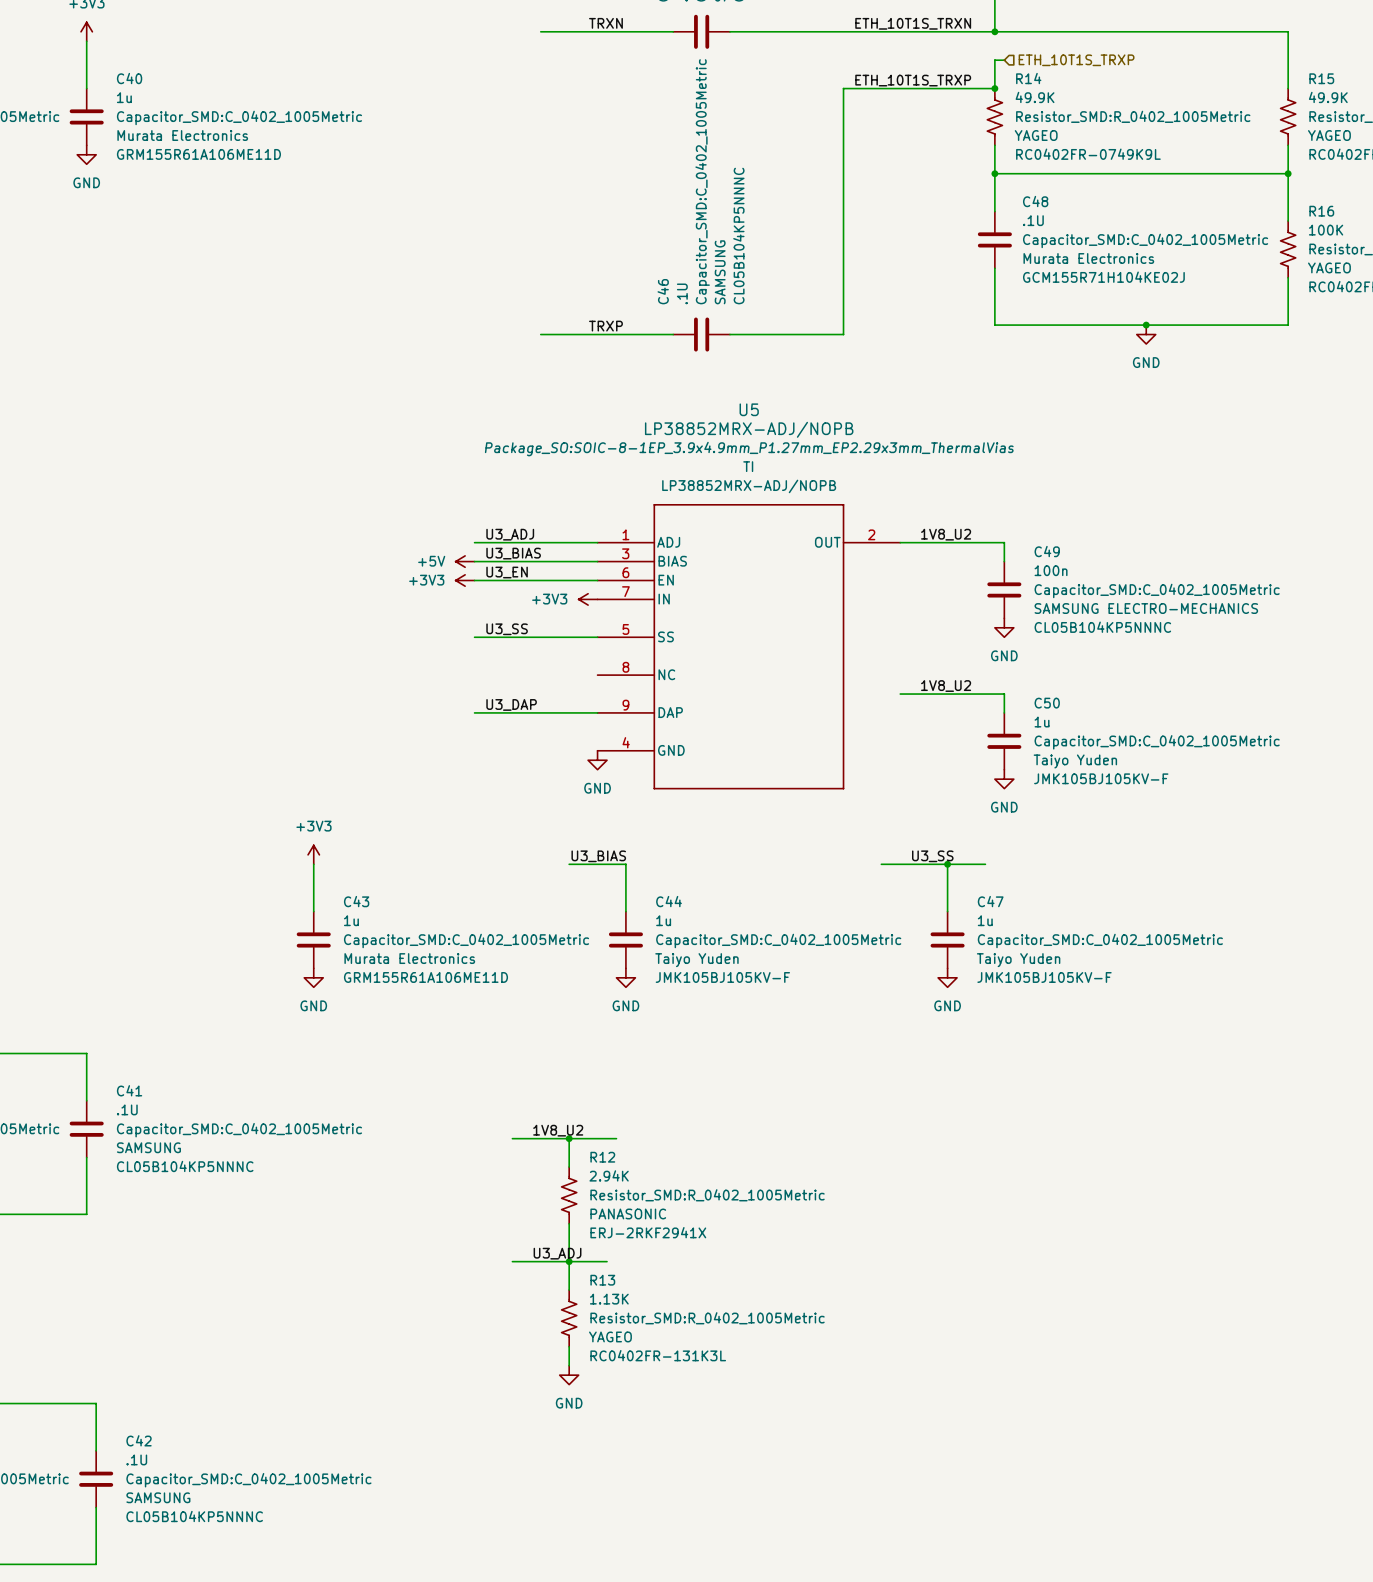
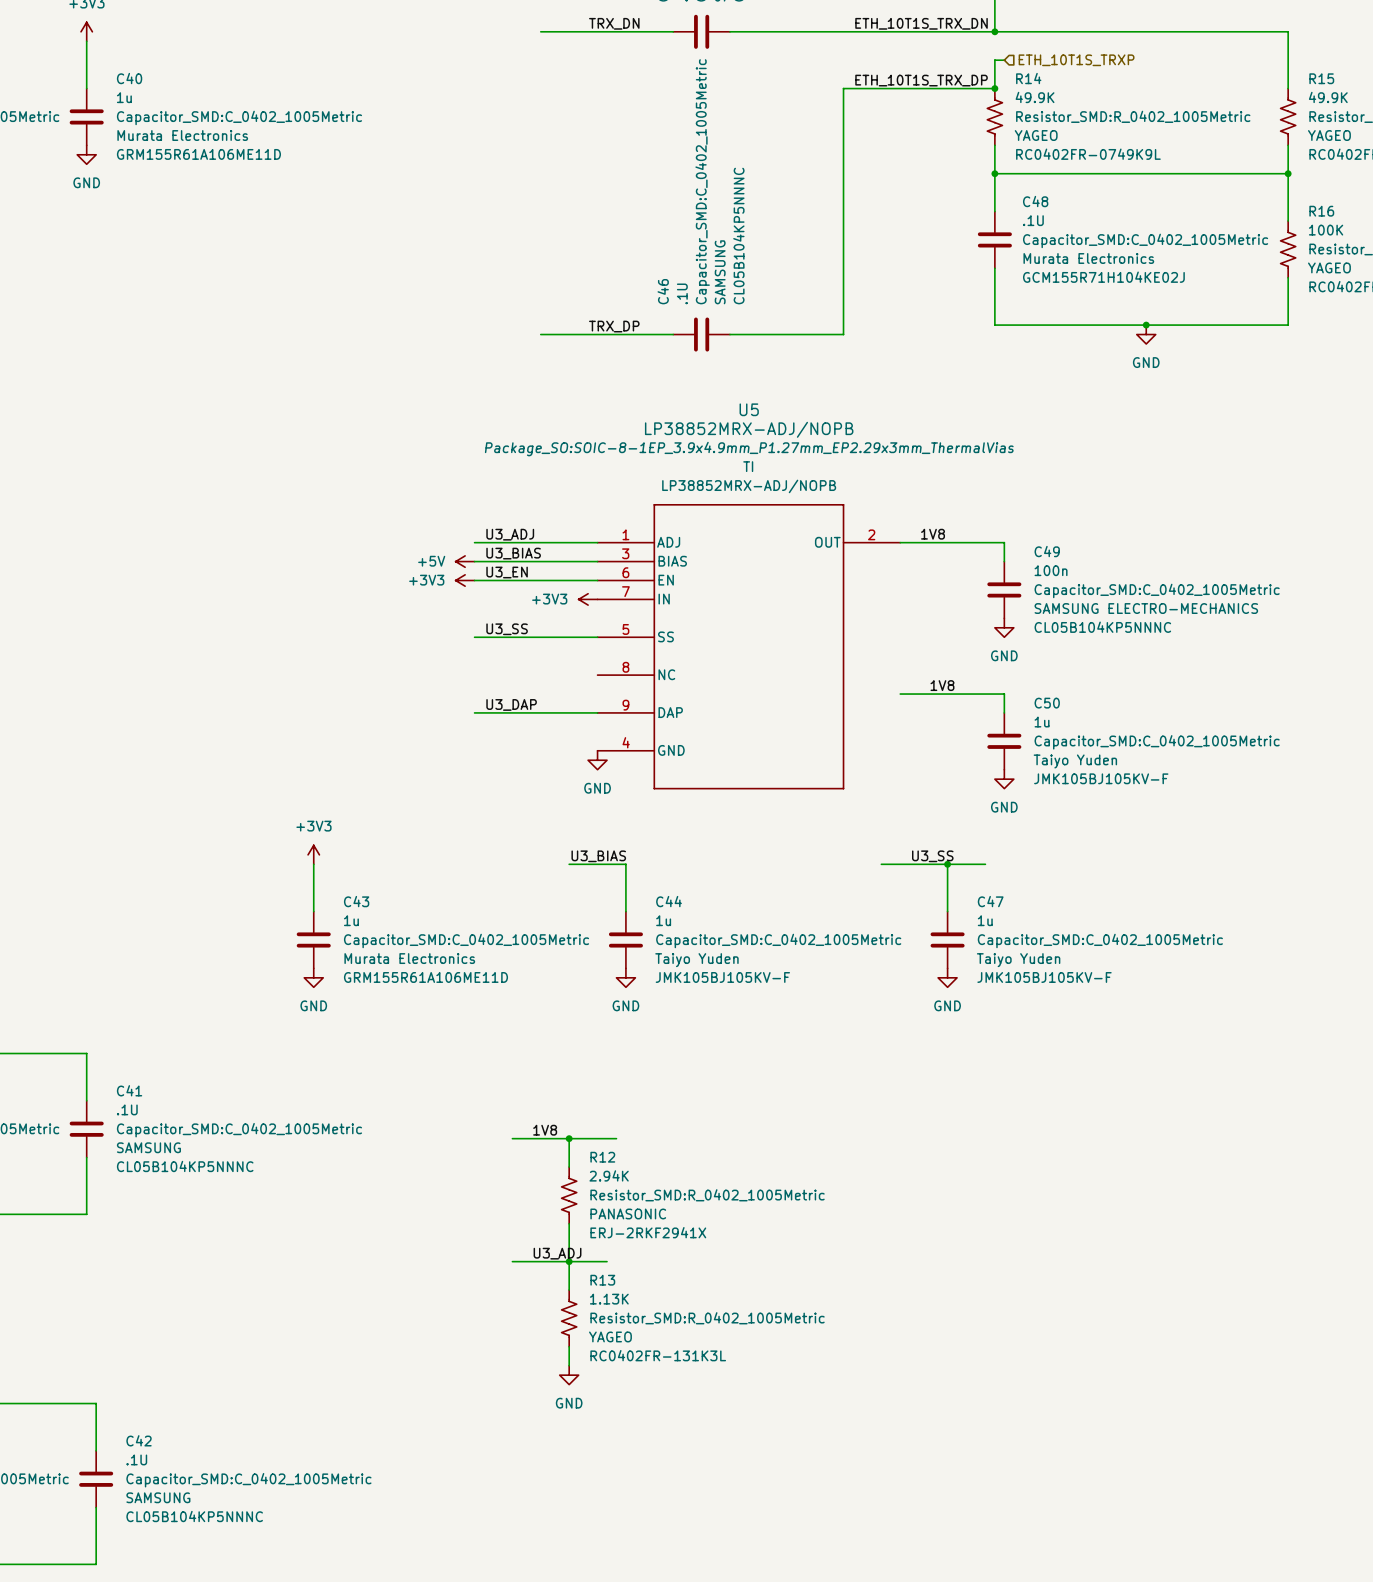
label: TRXN (605, 23) -> TRX_DN (614, 23)
label: ETH_10T1S_TRXN (913, 23) -> ETH_10T1S_TRX_DN (921, 23)
label: ETH_10T1S_TRXP (913, 80) -> ETH_10T1S_TRX_DP (921, 80)
label: TRXP (605, 326) -> TRX_DP (614, 326)
label: 1V8_U2 (946, 534) -> 1V8 (933, 534)
label: 1V8_U2 (946, 686) -> 1V8 (942, 685)
label: 1V8_U2 (558, 1130) -> 1V8 (545, 1130)

